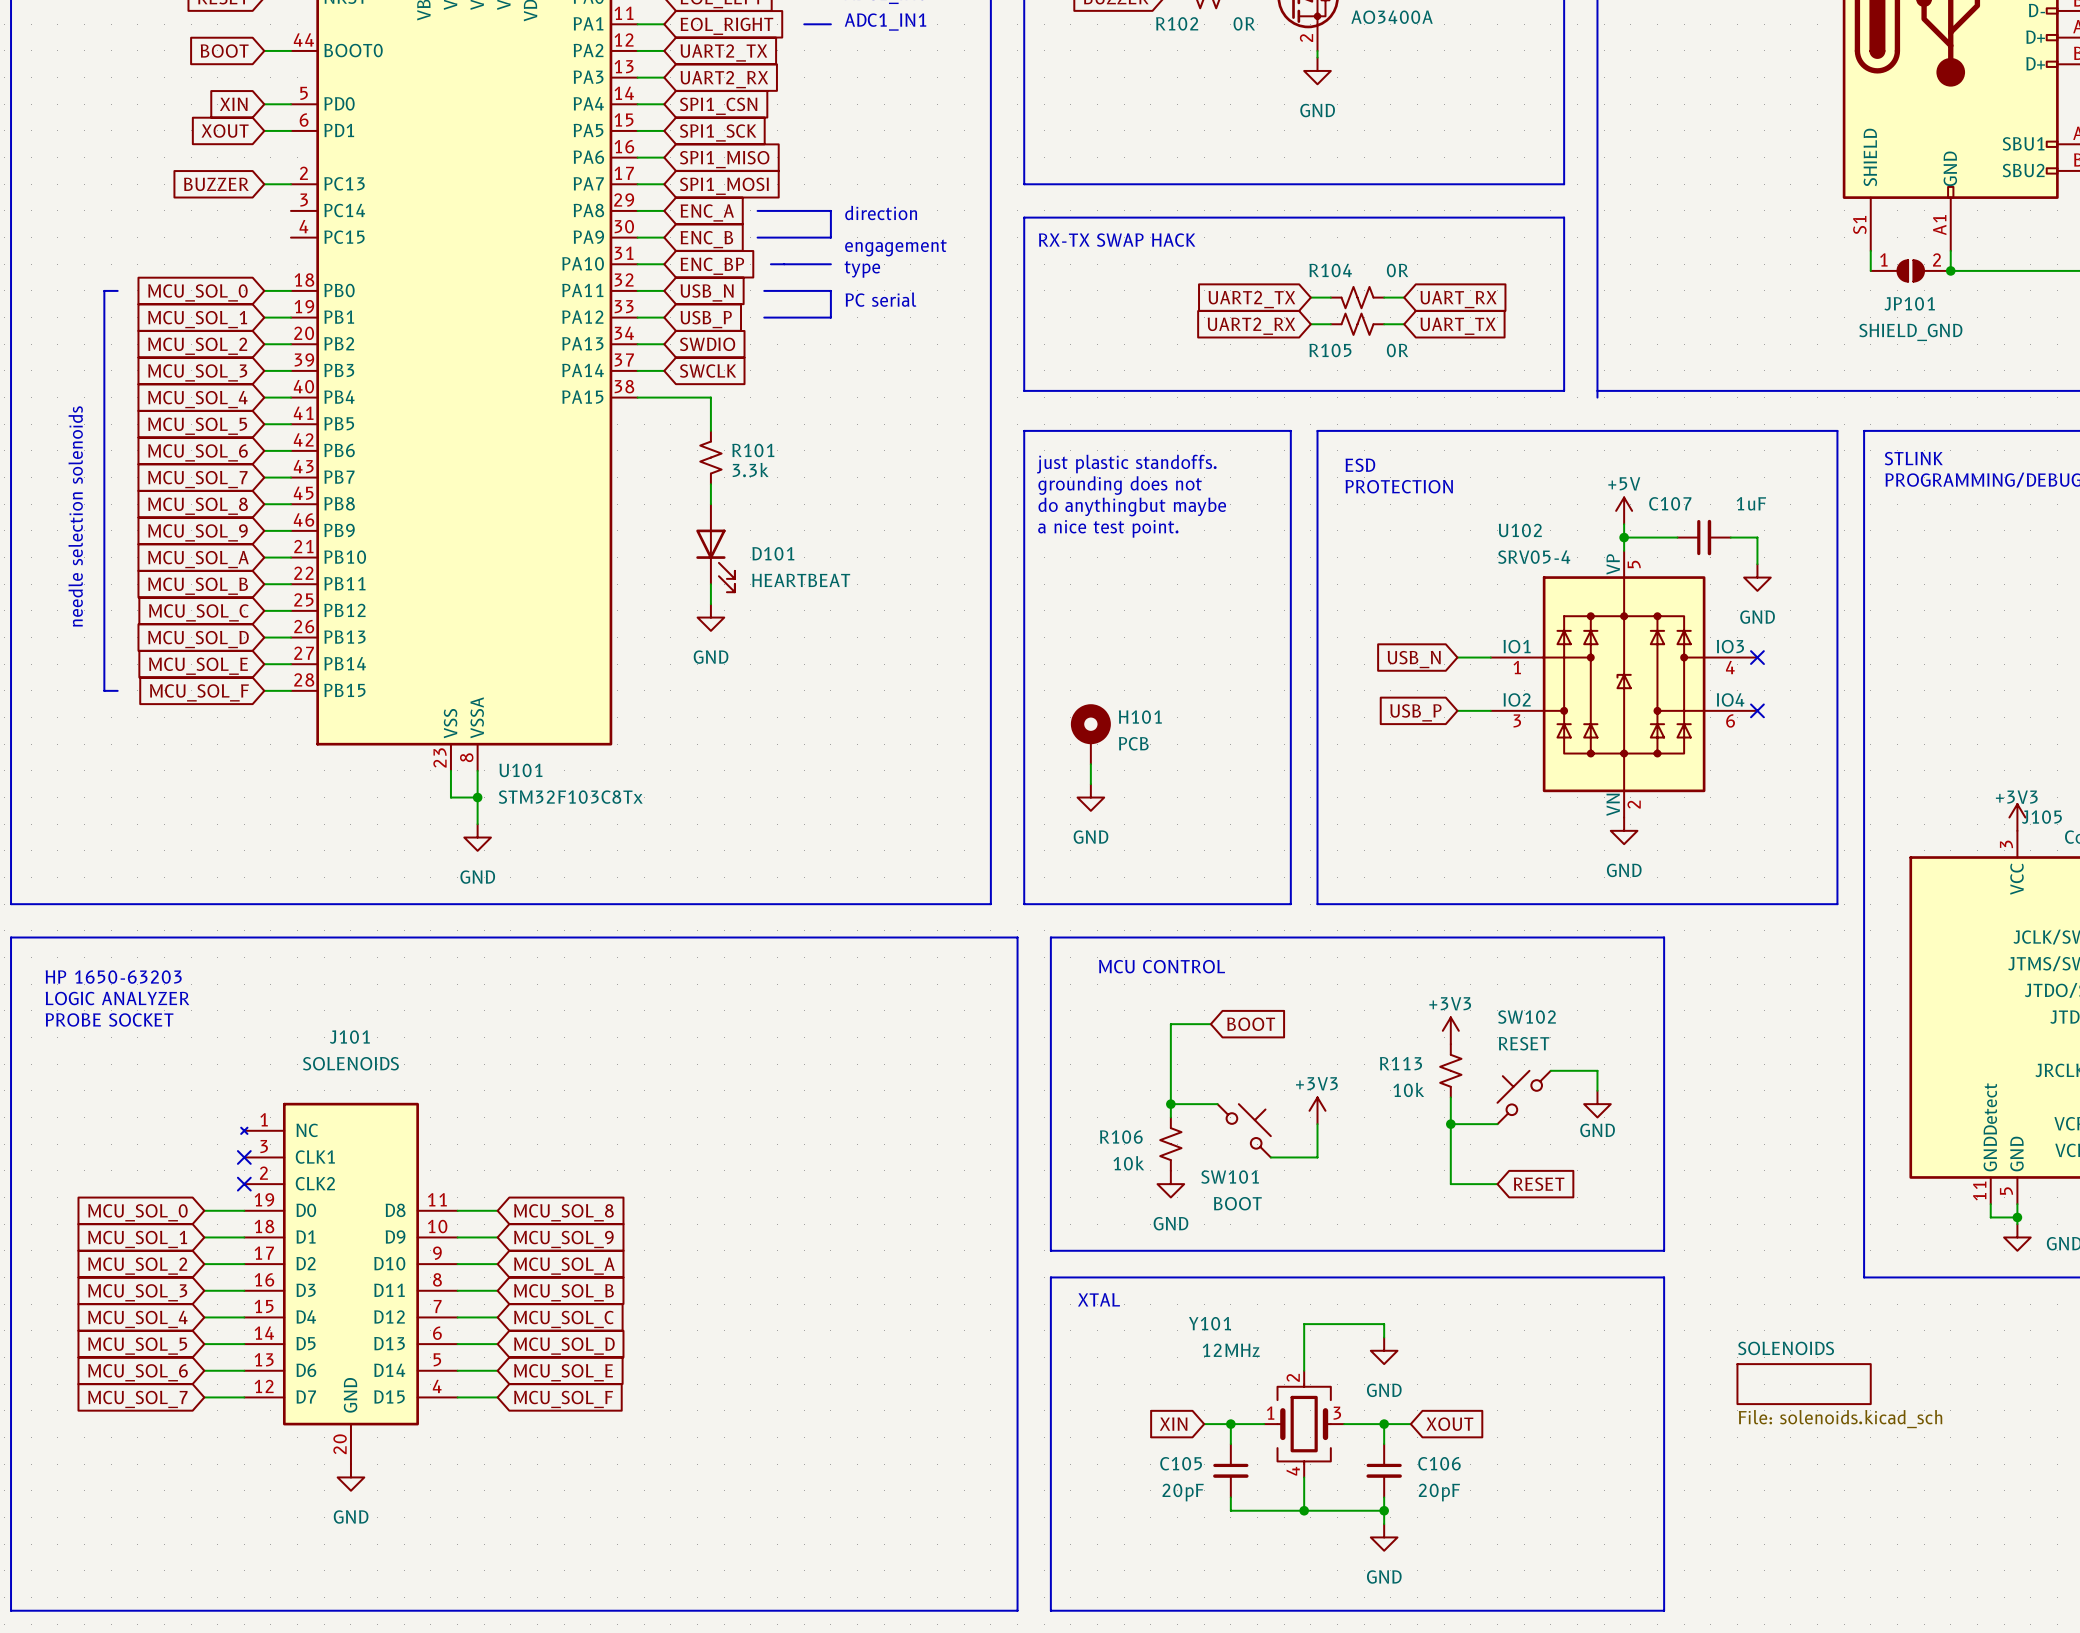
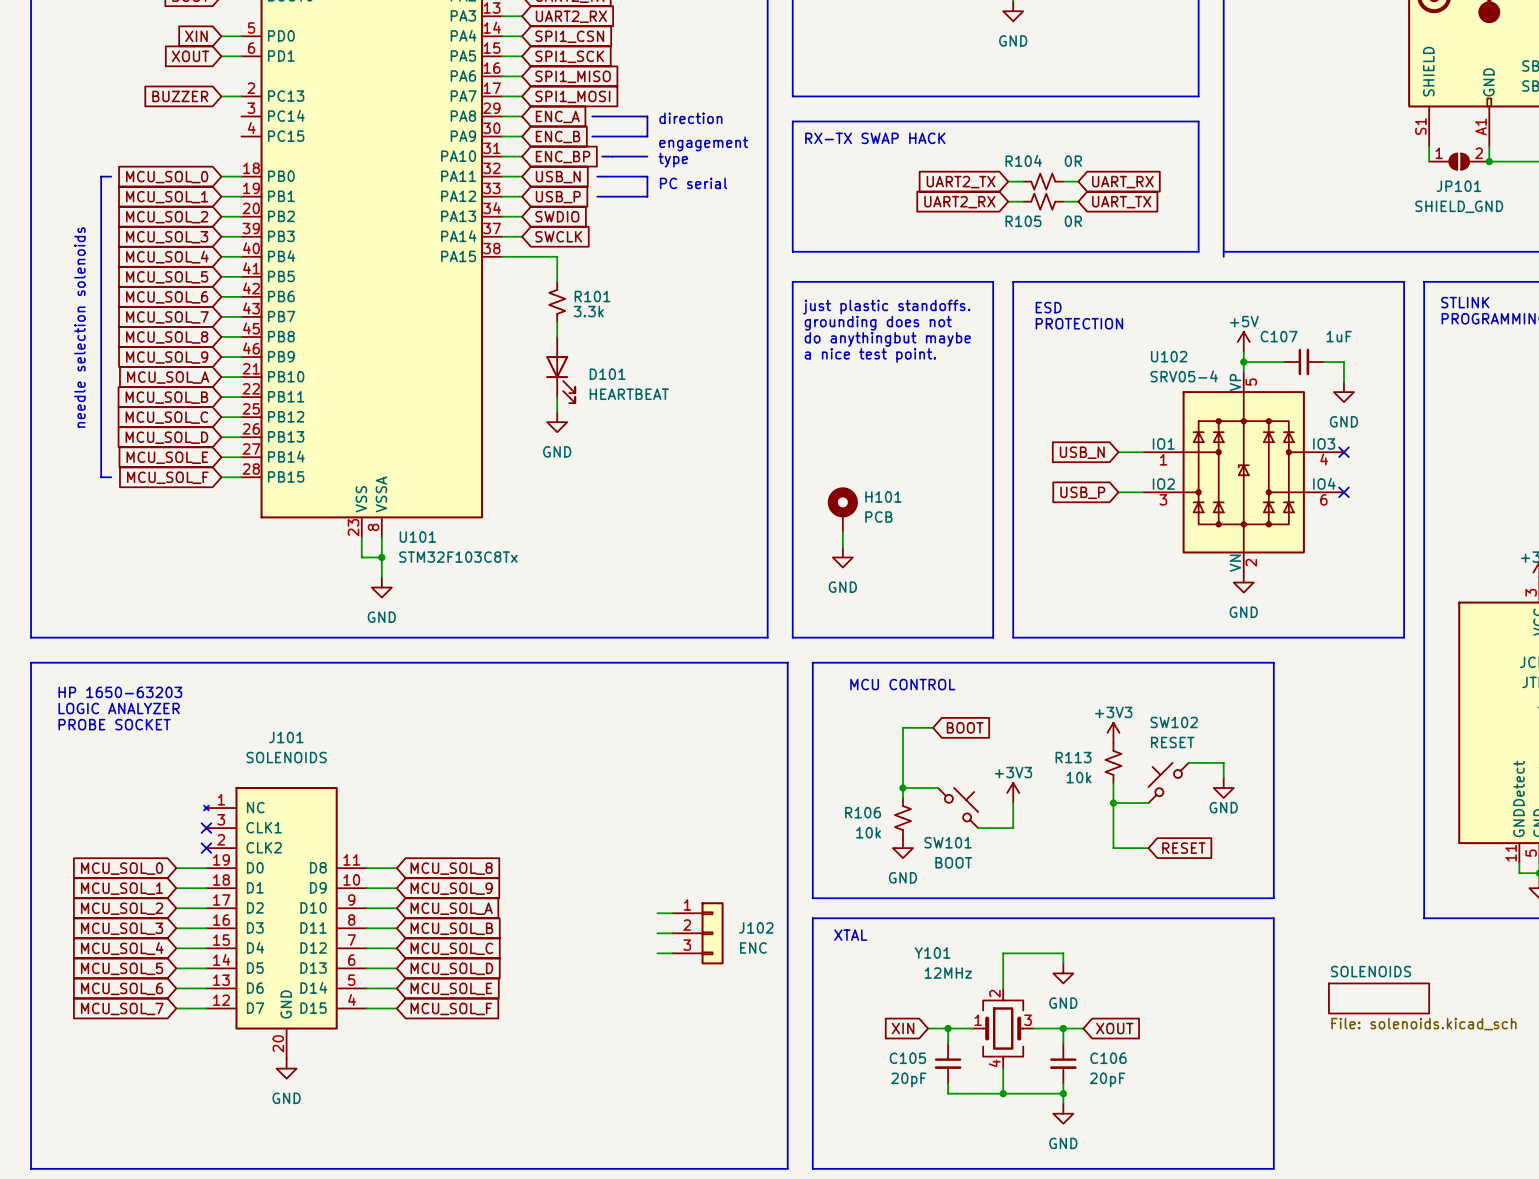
wire: none -> (657, 913) (672, 913)
wire: none -> (657, 933) (672, 933)
J102: none -> ENC (698, 933)
wire: none -> (657, 953) (672, 953)

